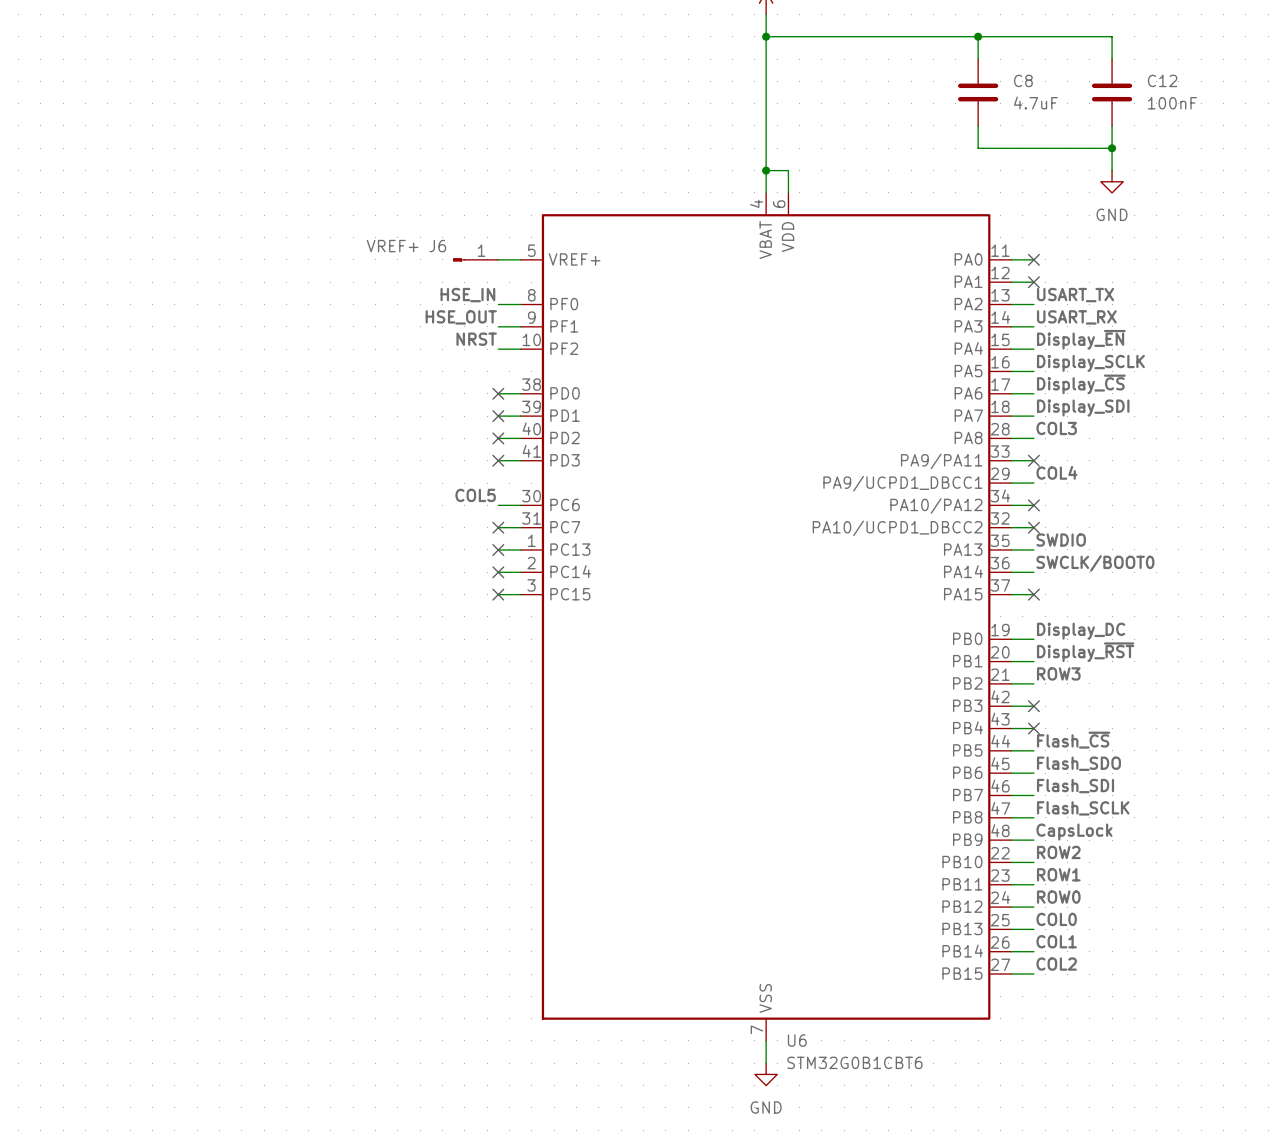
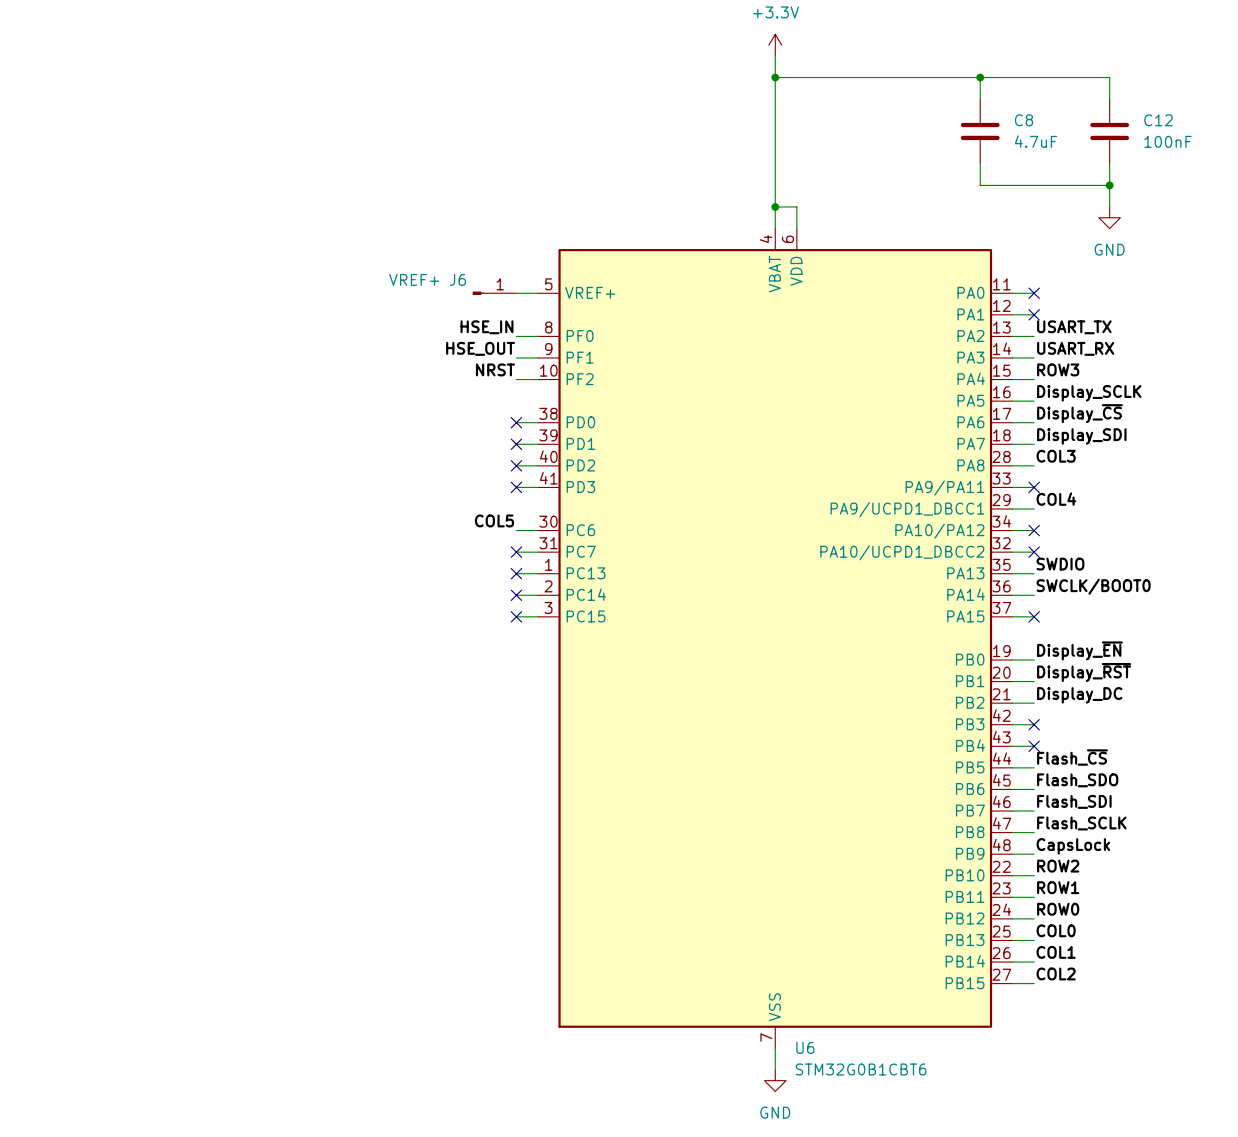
label: Display_~{EN} (1081, 339) -> ROW3 (1058, 369)
label: Display_DC (1081, 631) -> Display_~{EN} (1079, 650)
label: ROW3 (1058, 673) -> Display_DC (1079, 695)

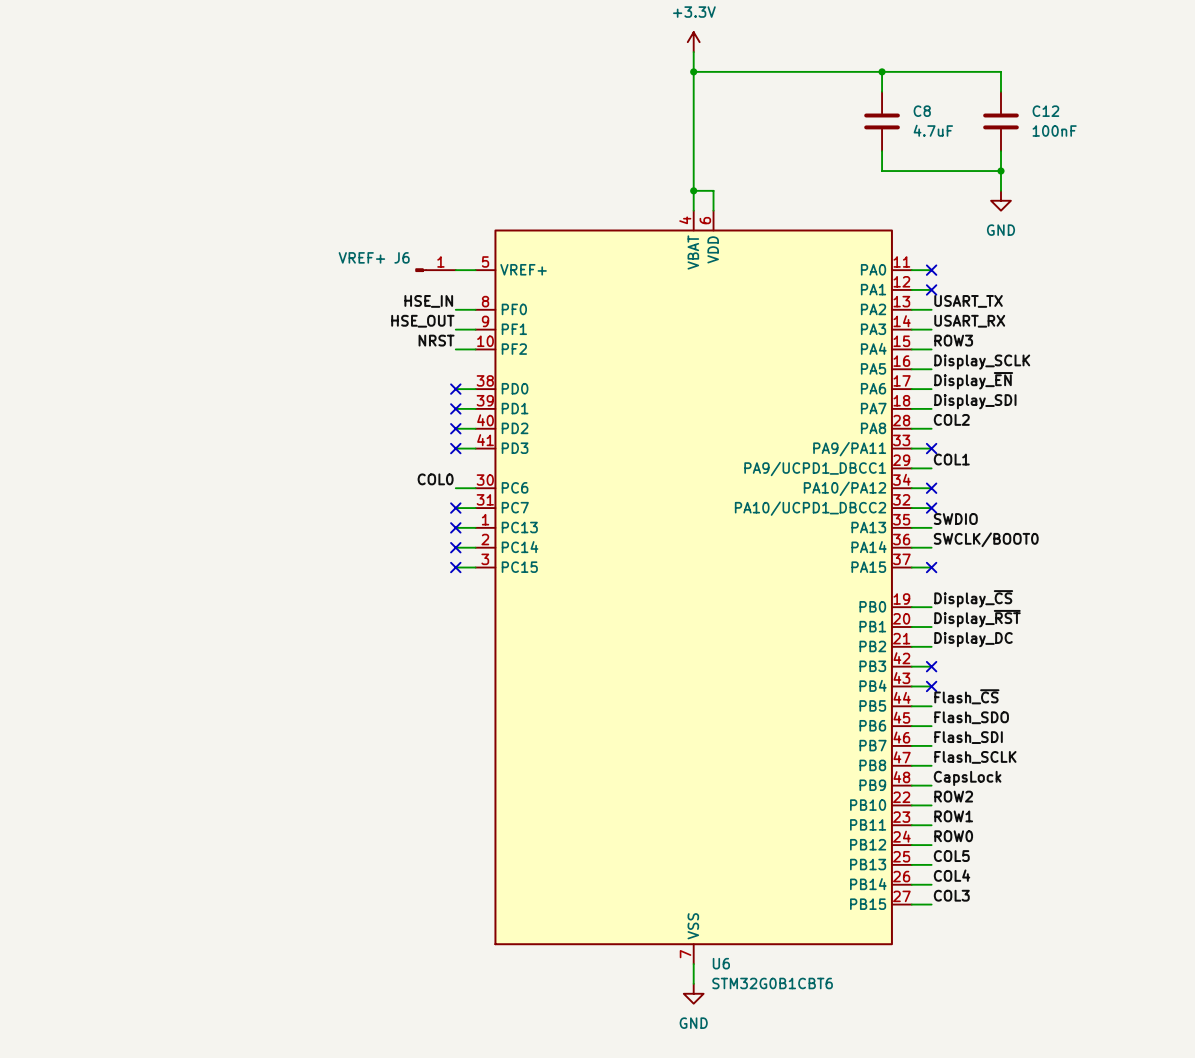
label: Display_~{CS} (1079, 413) -> Display_~{EN} (973, 380)
label: COL3 (1056, 456) -> COL2 (951, 419)
label: COL4 (1056, 499) -> COL1 (951, 459)
label: COL5 (494, 520) -> COL0 (435, 479)
label: Display_~{EN} (1079, 650) -> Display_~{CS} (973, 598)
label: COL0 (1056, 930) -> COL5 (951, 856)
label: COL1 (1056, 952) -> COL4 (952, 875)
label: COL2 (1056, 973) -> COL3 (951, 895)

